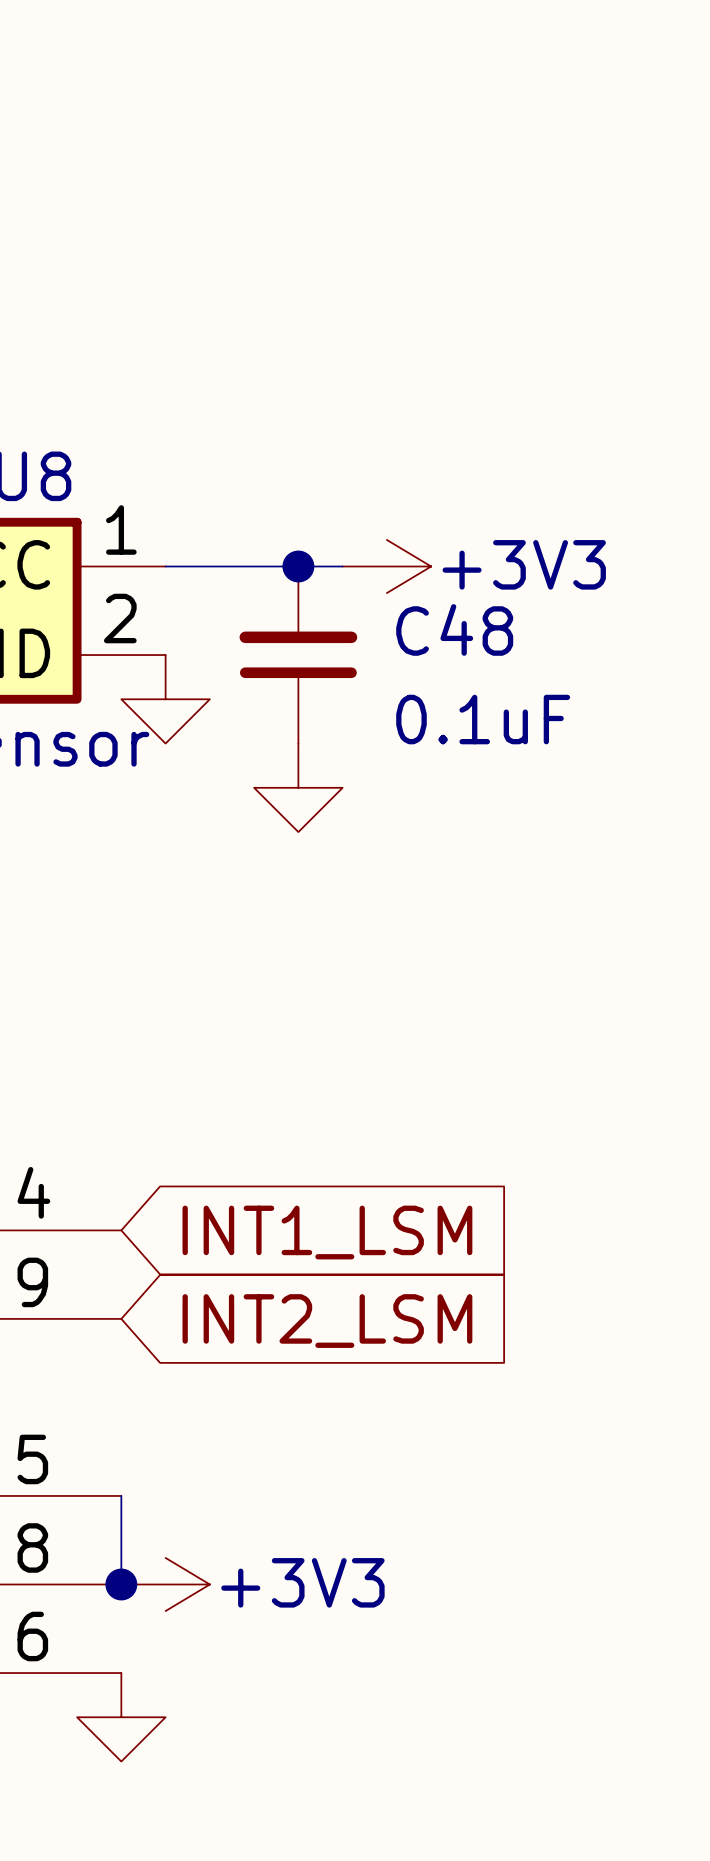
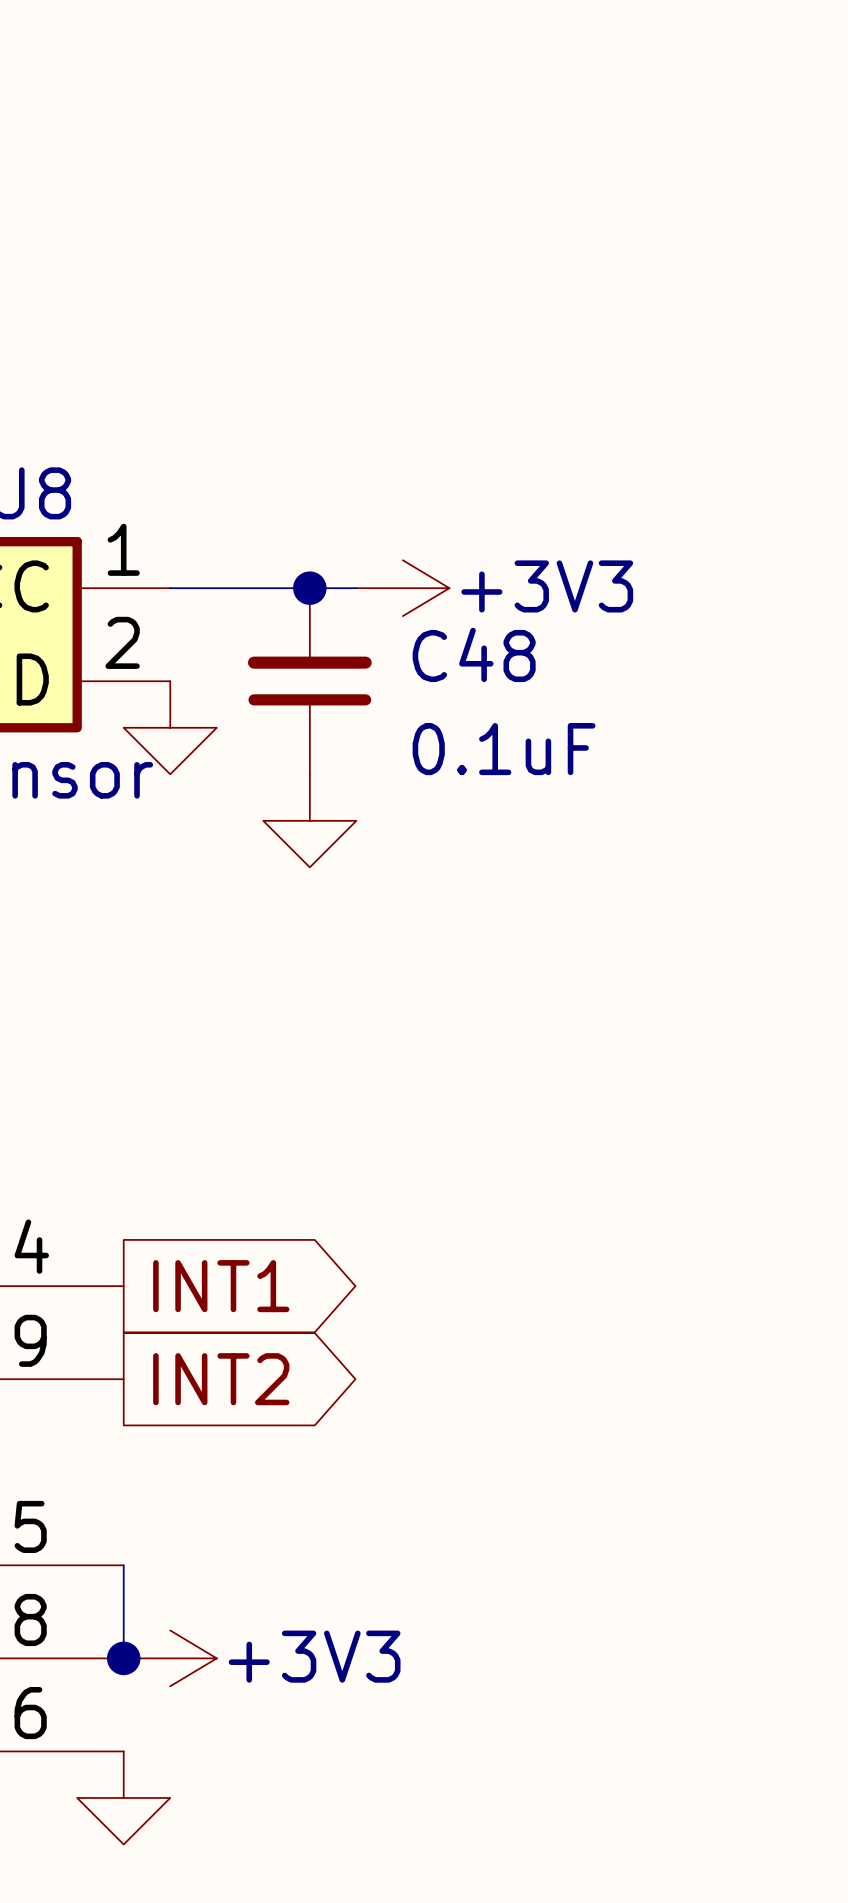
global label shape: input (327, 1232) -> output (221, 1286)
global label: INT1_LSM (327, 1232) -> INT1 (221, 1286)
global label shape: input (327, 1321) -> output (221, 1379)
global label: INT2_LSM (327, 1321) -> INT2 (221, 1379)

